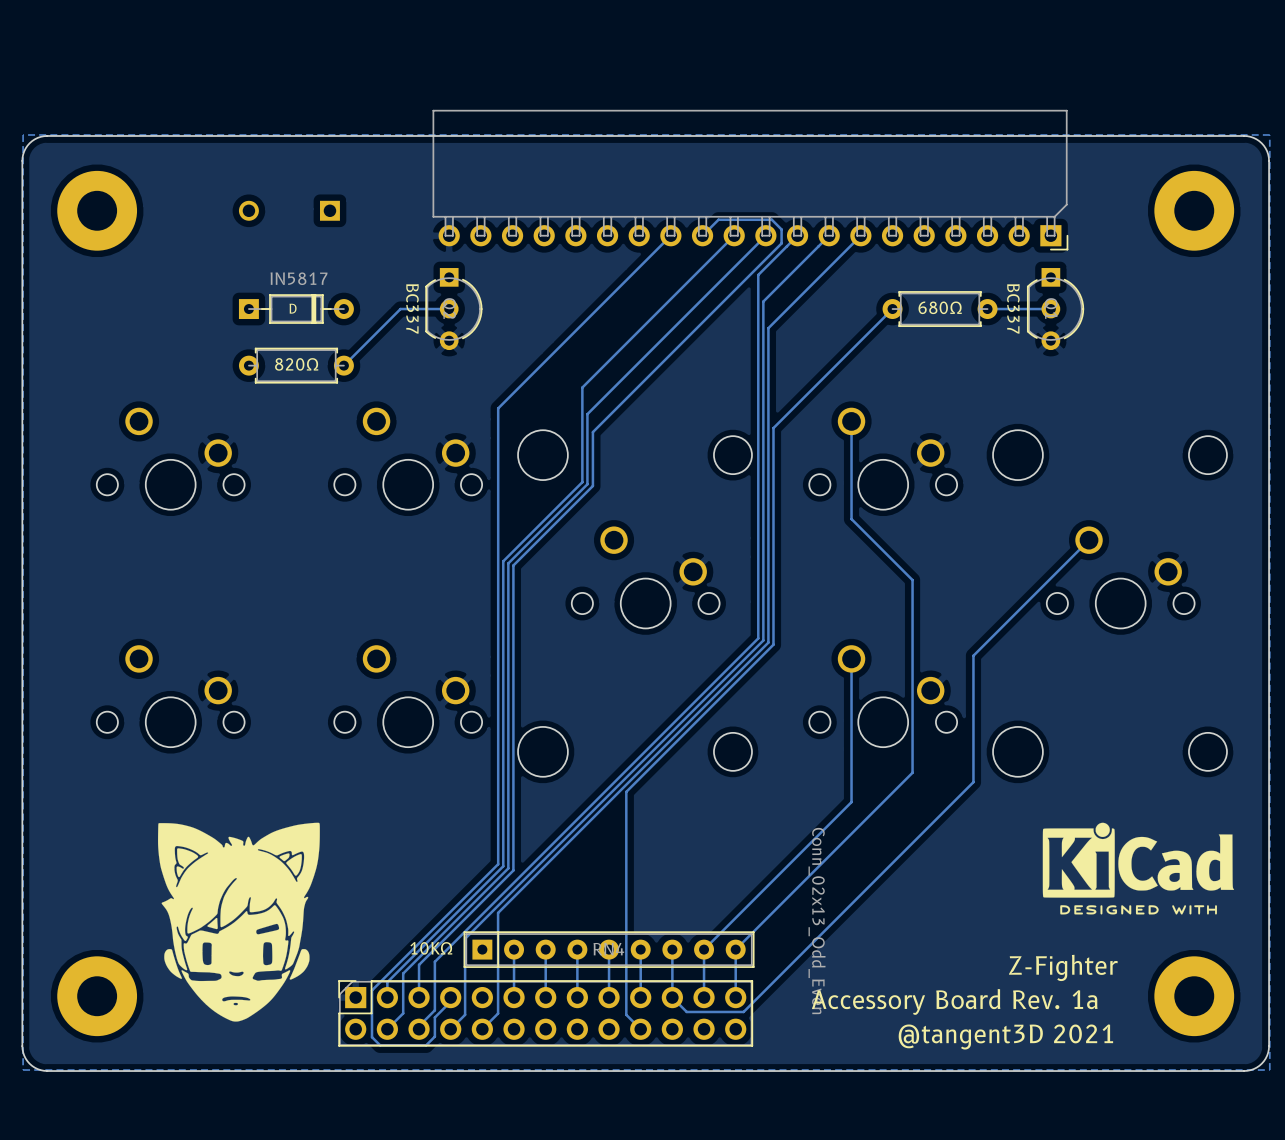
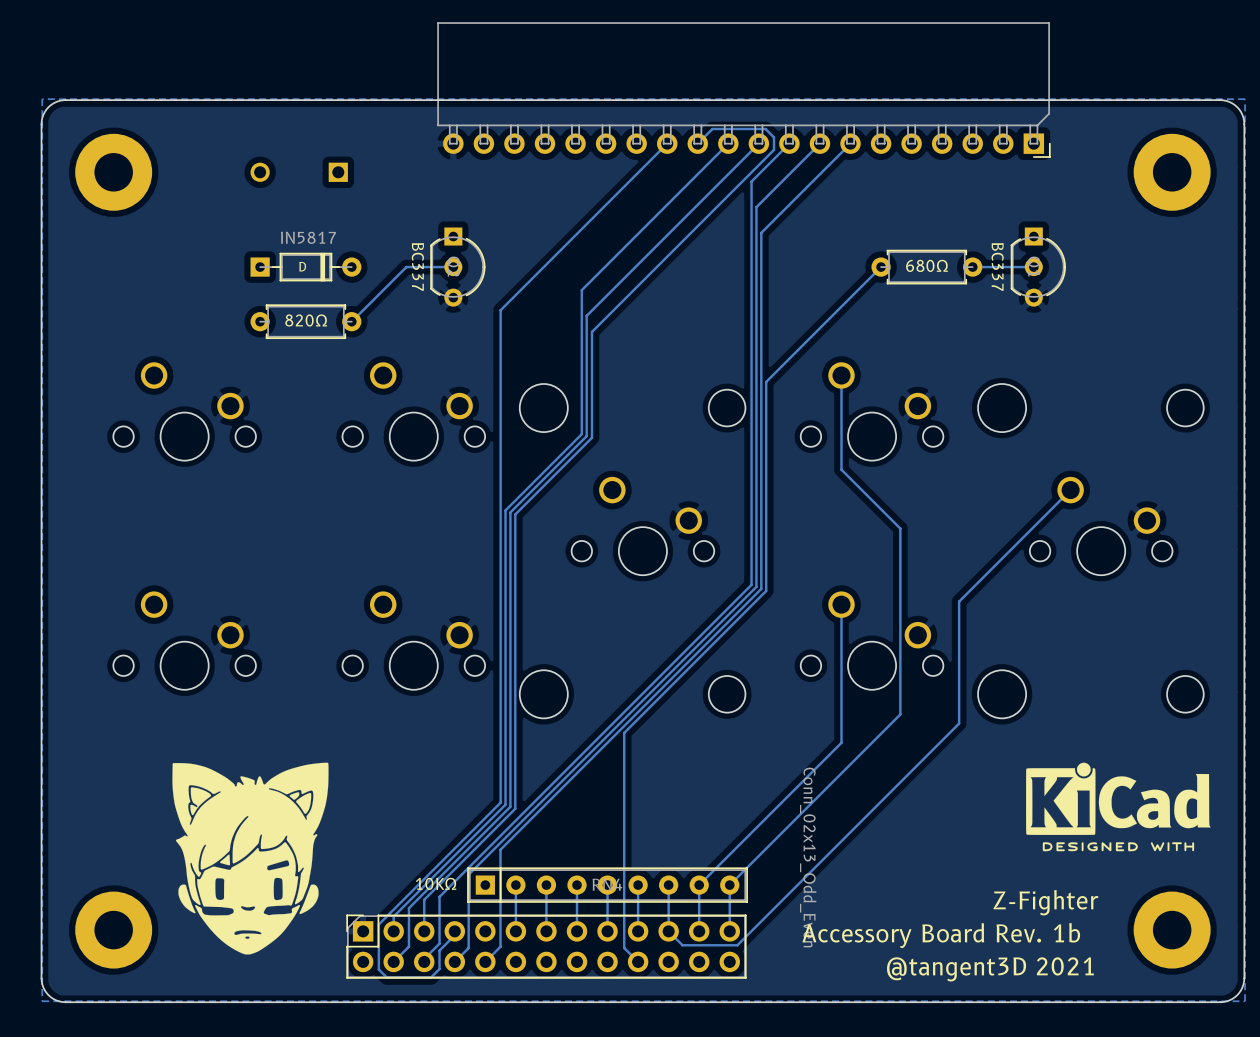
part position: (750, 180) -> (744, 90)
track: (670, 235) (498, 408) -> (667, 143) (500, 310) (500, 362)
track: (702, 235) (718, 219) (771, 219) (781, 229) (781, 243) (592, 432) -> (697, 143) (712, 129) (765, 129) (774, 137) (774, 149) (591, 331) (591, 385)
track: (734, 235) (582, 387) -> (728, 143) (581, 290) (581, 342)
track: (765, 235) (587, 414) -> (758, 143) (586, 315) (586, 368)
track: (797, 235) (758, 274) -> (789, 143) (751, 181) (751, 234)
track: (829, 235) (763, 301) -> (819, 143) (756, 207) (756, 259)
track: (860, 235) (768, 328) -> (850, 143) (761, 232) (761, 285)
text: Accessory Board Rev. 1a (954, 1001) -> Accessory Board Rev. 1b (941, 935)

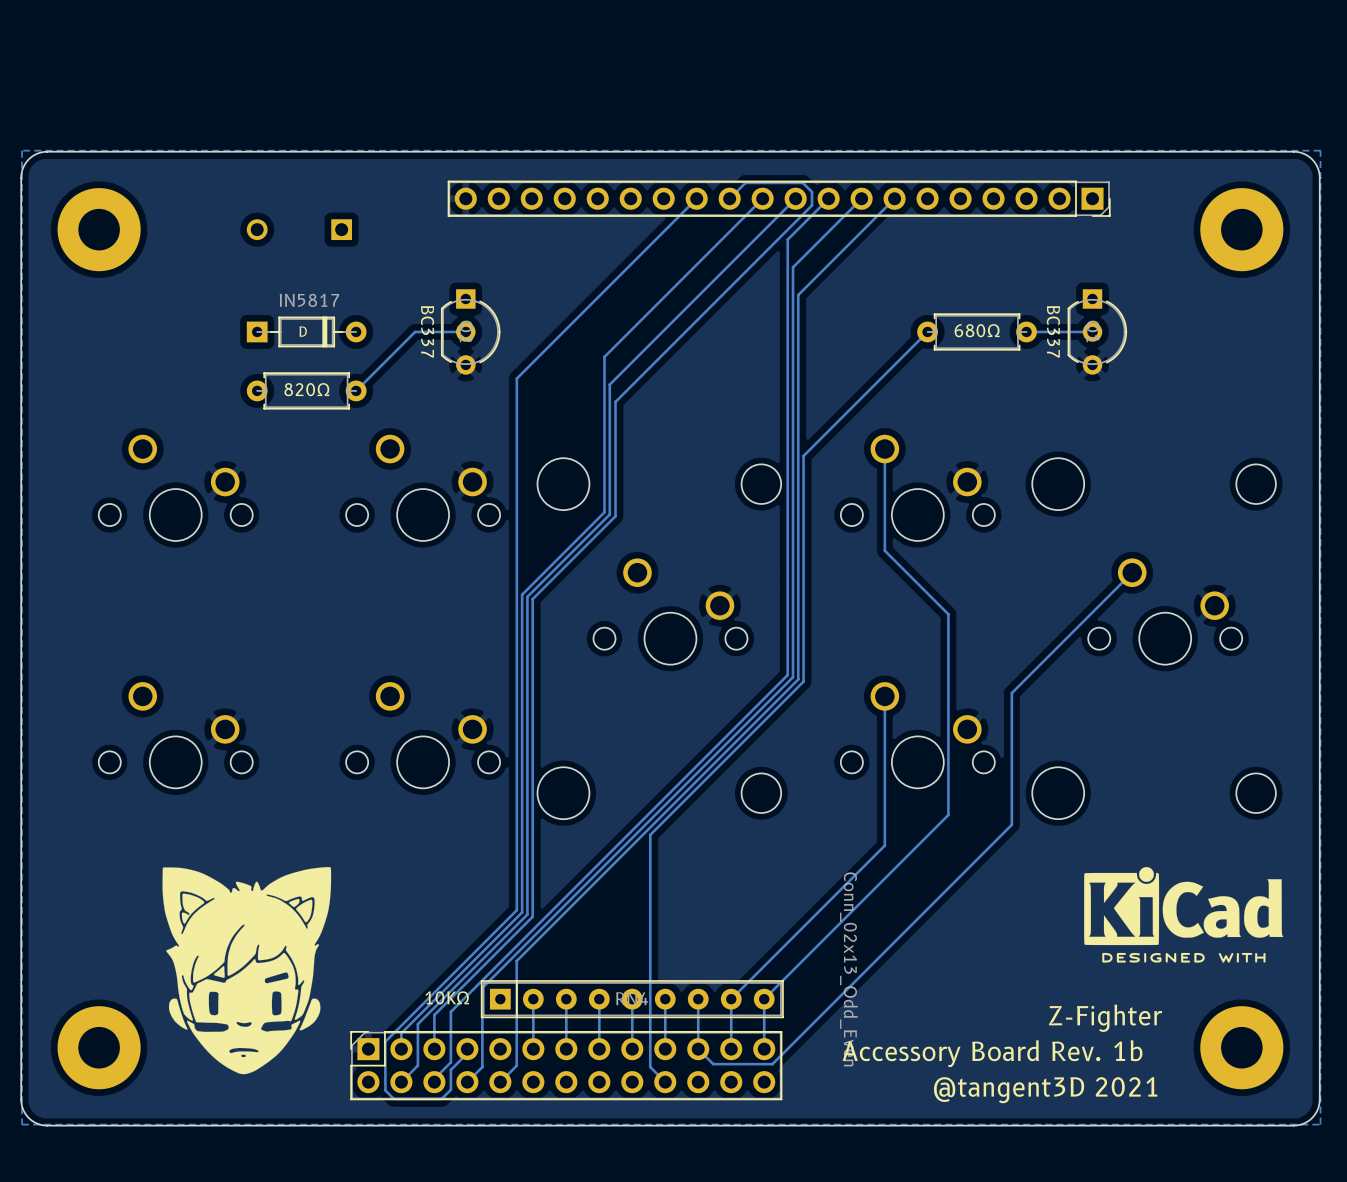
part: (744, 90) -> none
part: none -> (779, 198)

